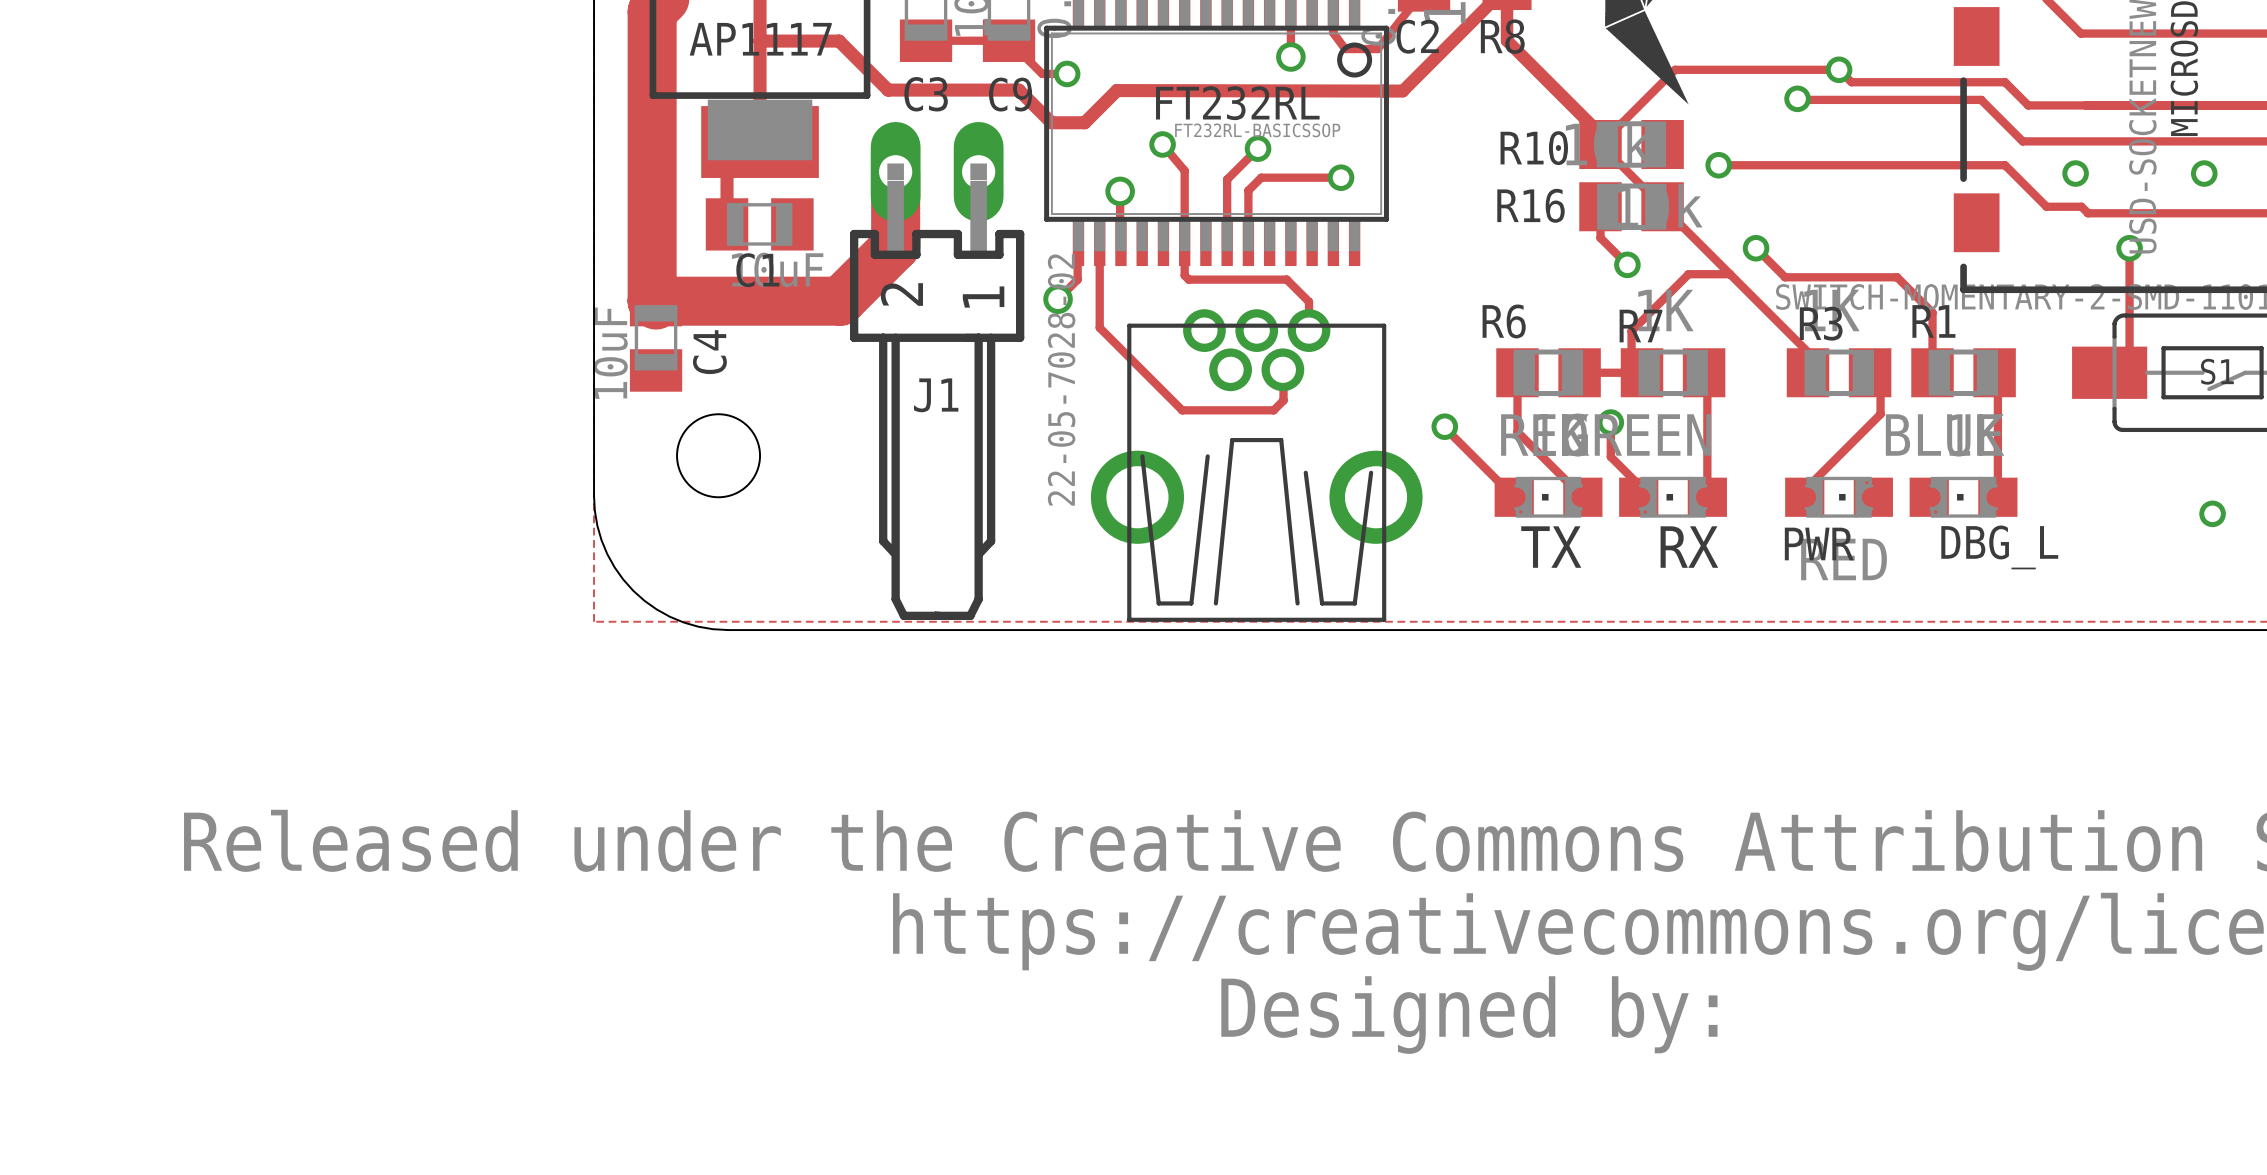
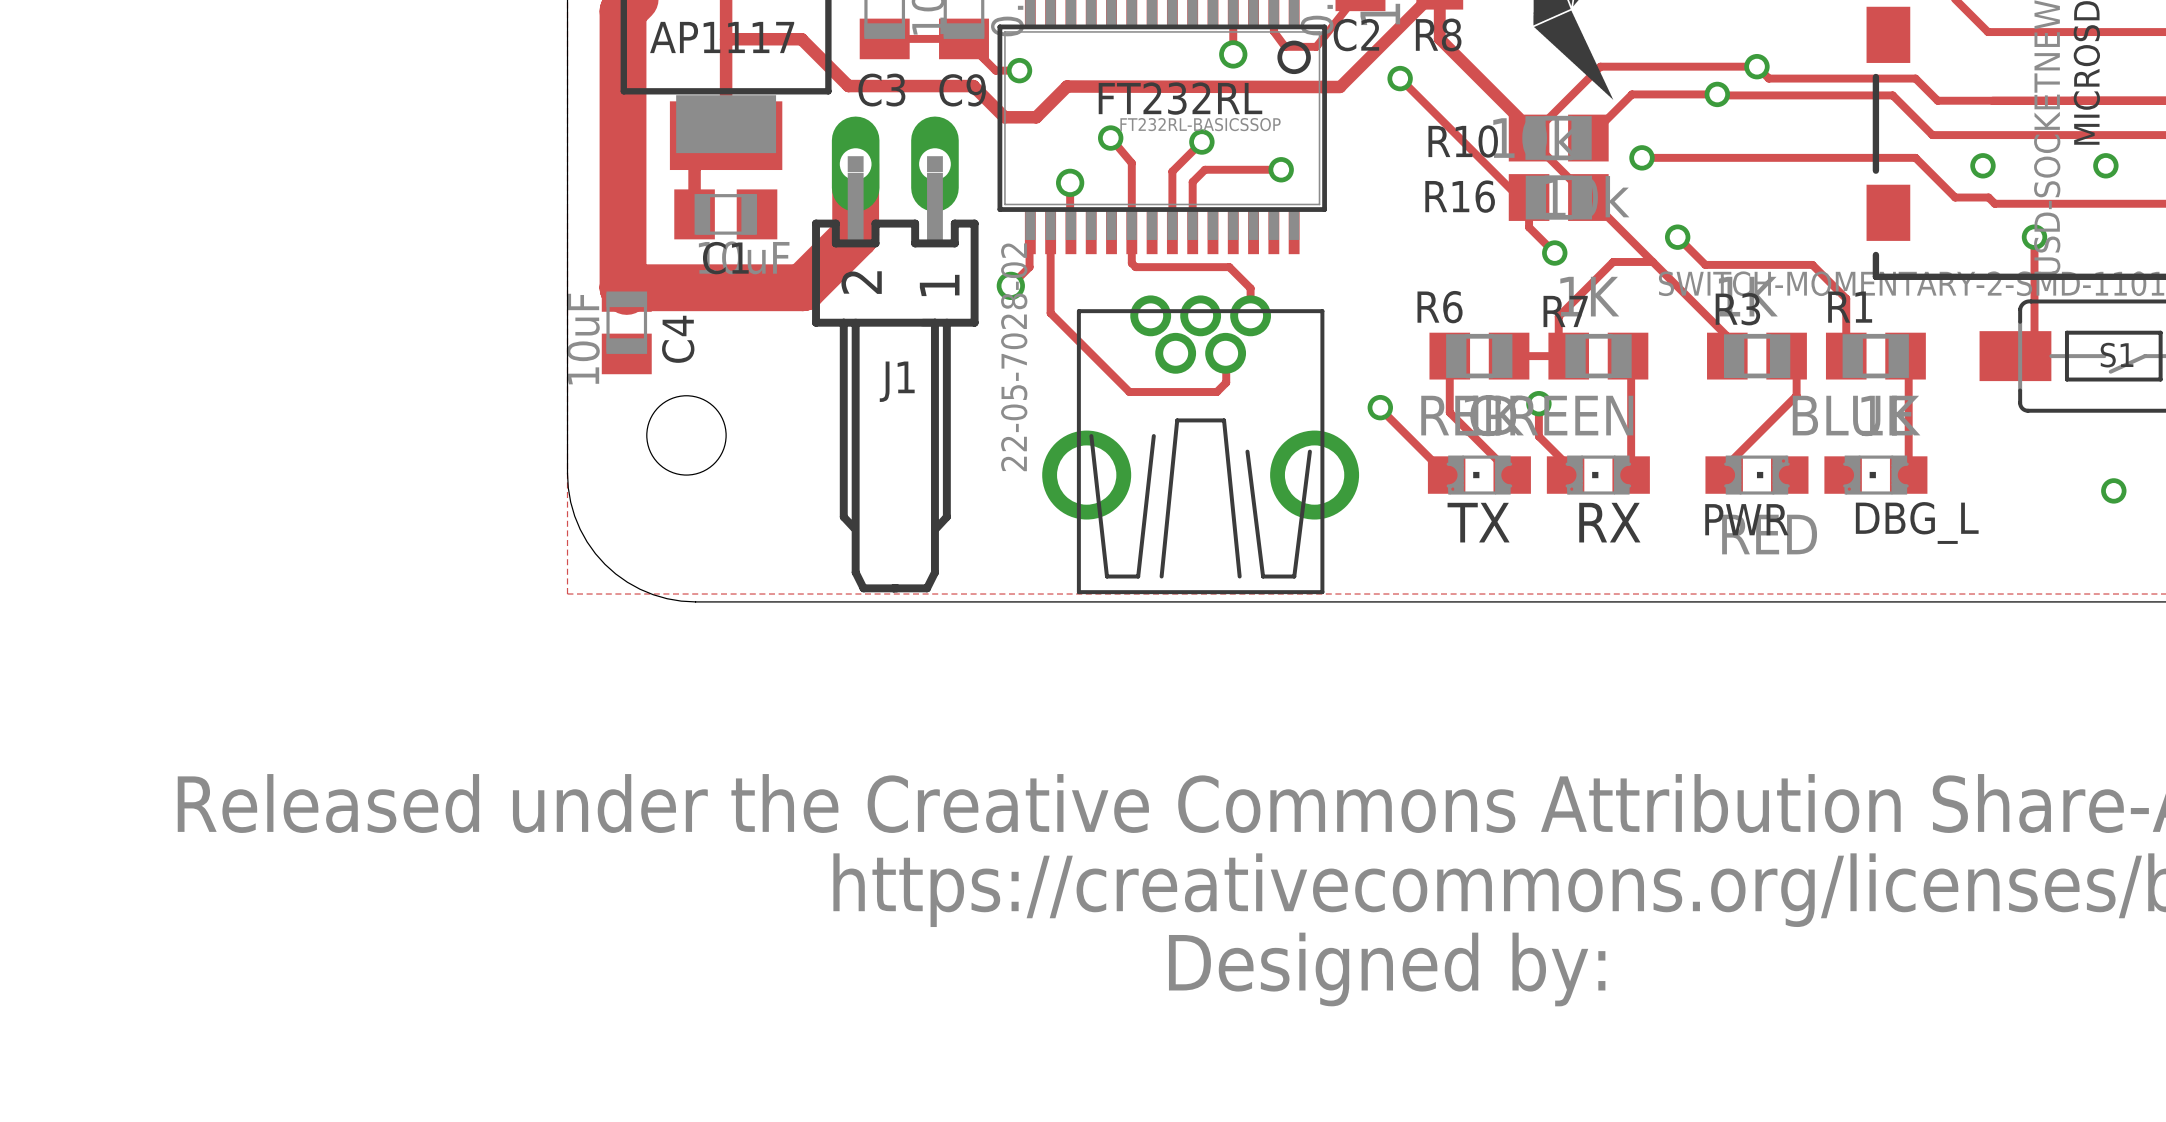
track: none -> (1400, 78) (1519, 197) (1529, 197)
via: none -> (1400, 78)
track: none -> (1711, 94) (1631, 94) (1588, 138)

